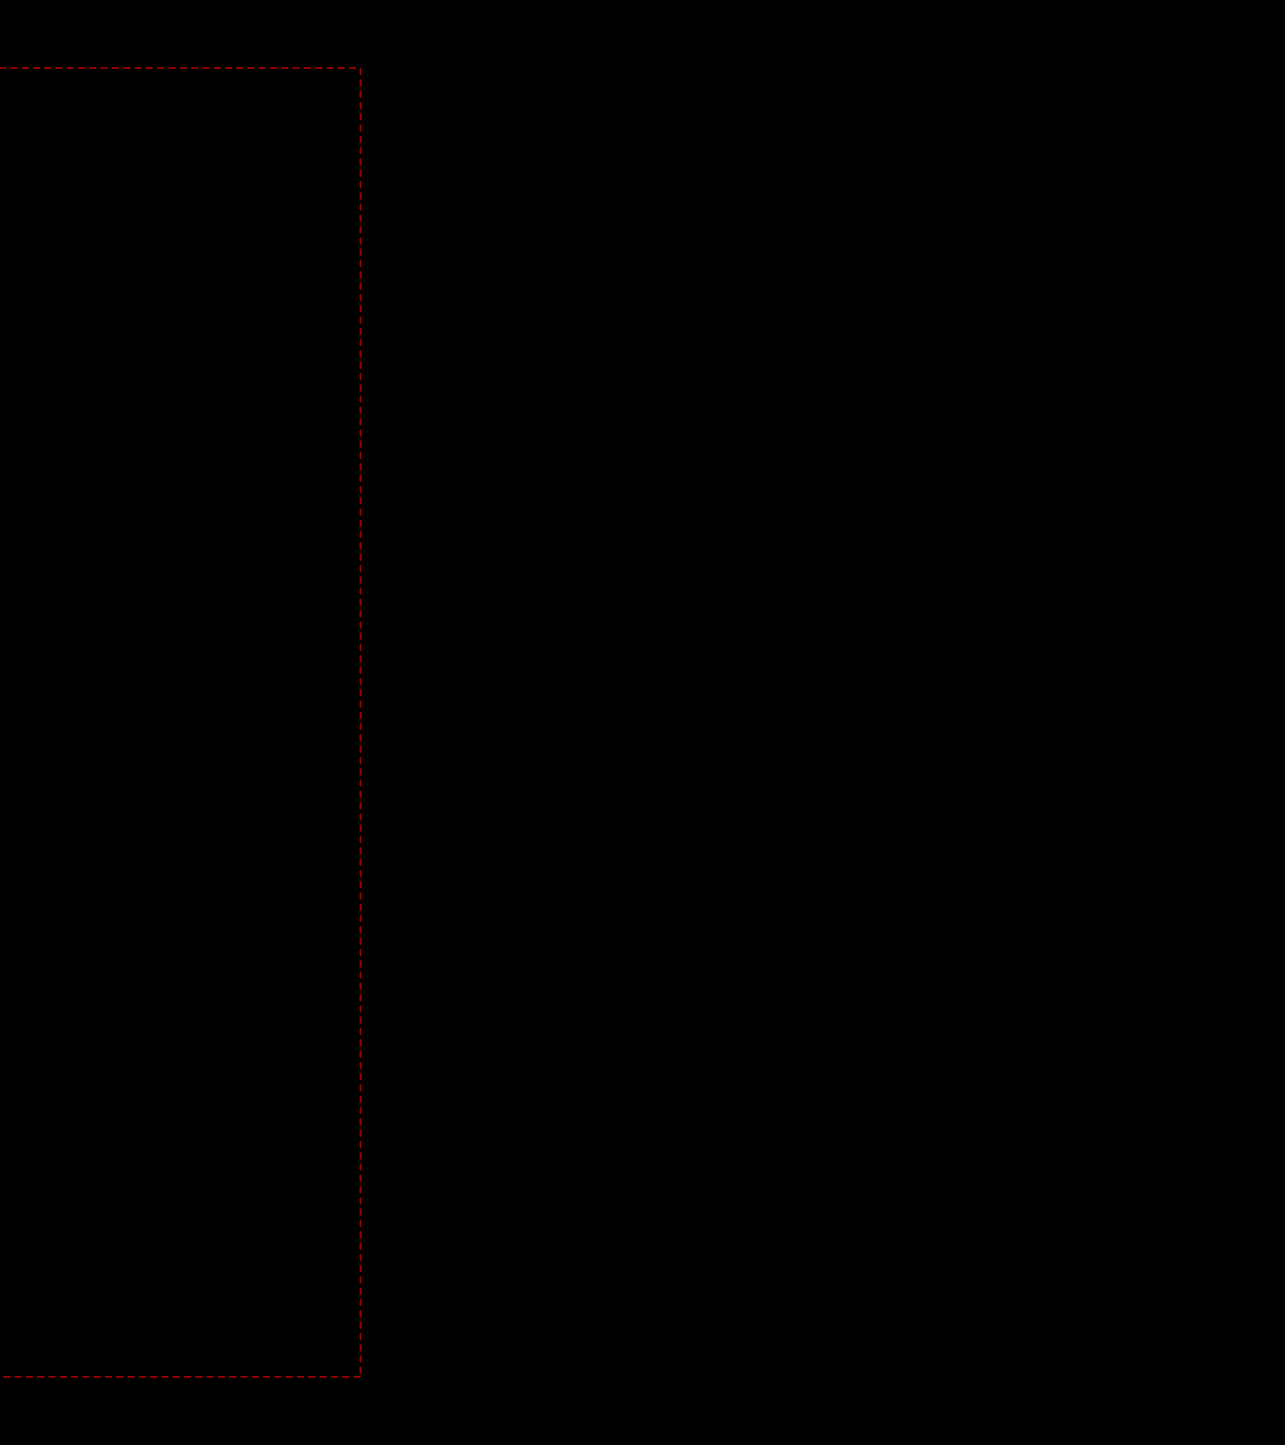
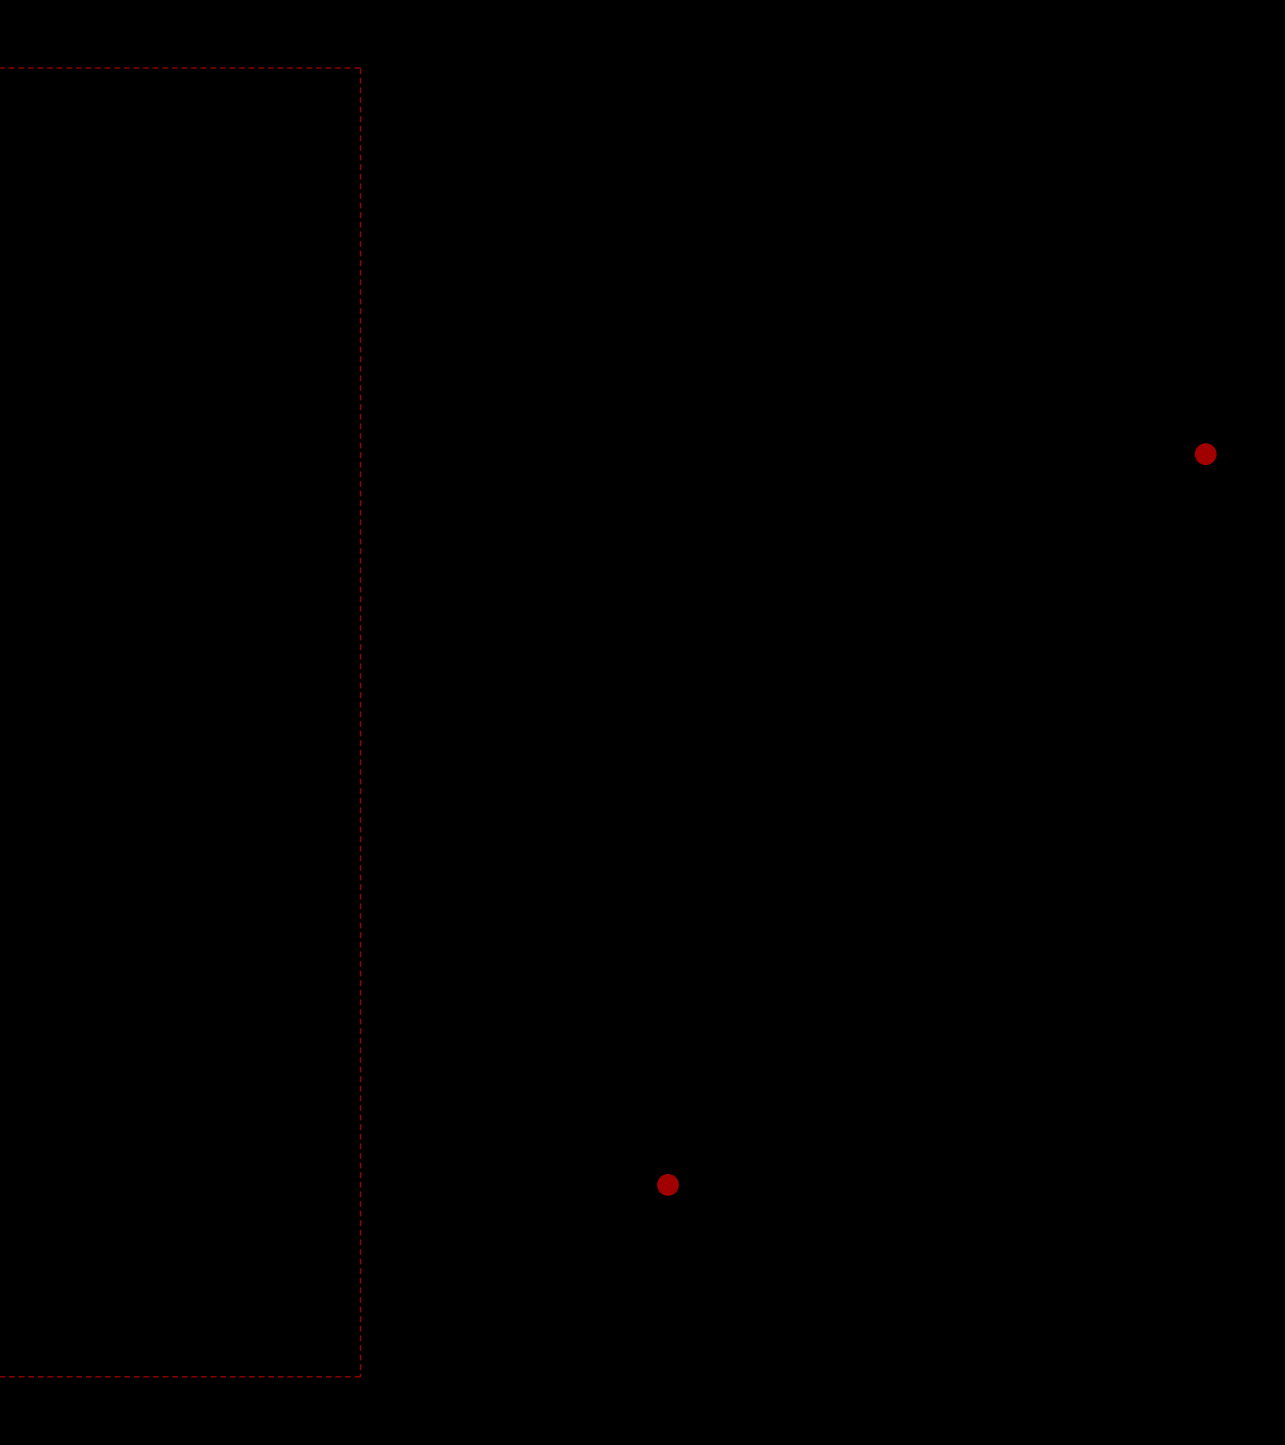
part: none -> (1205, 454)
part: none -> (668, 1184)

